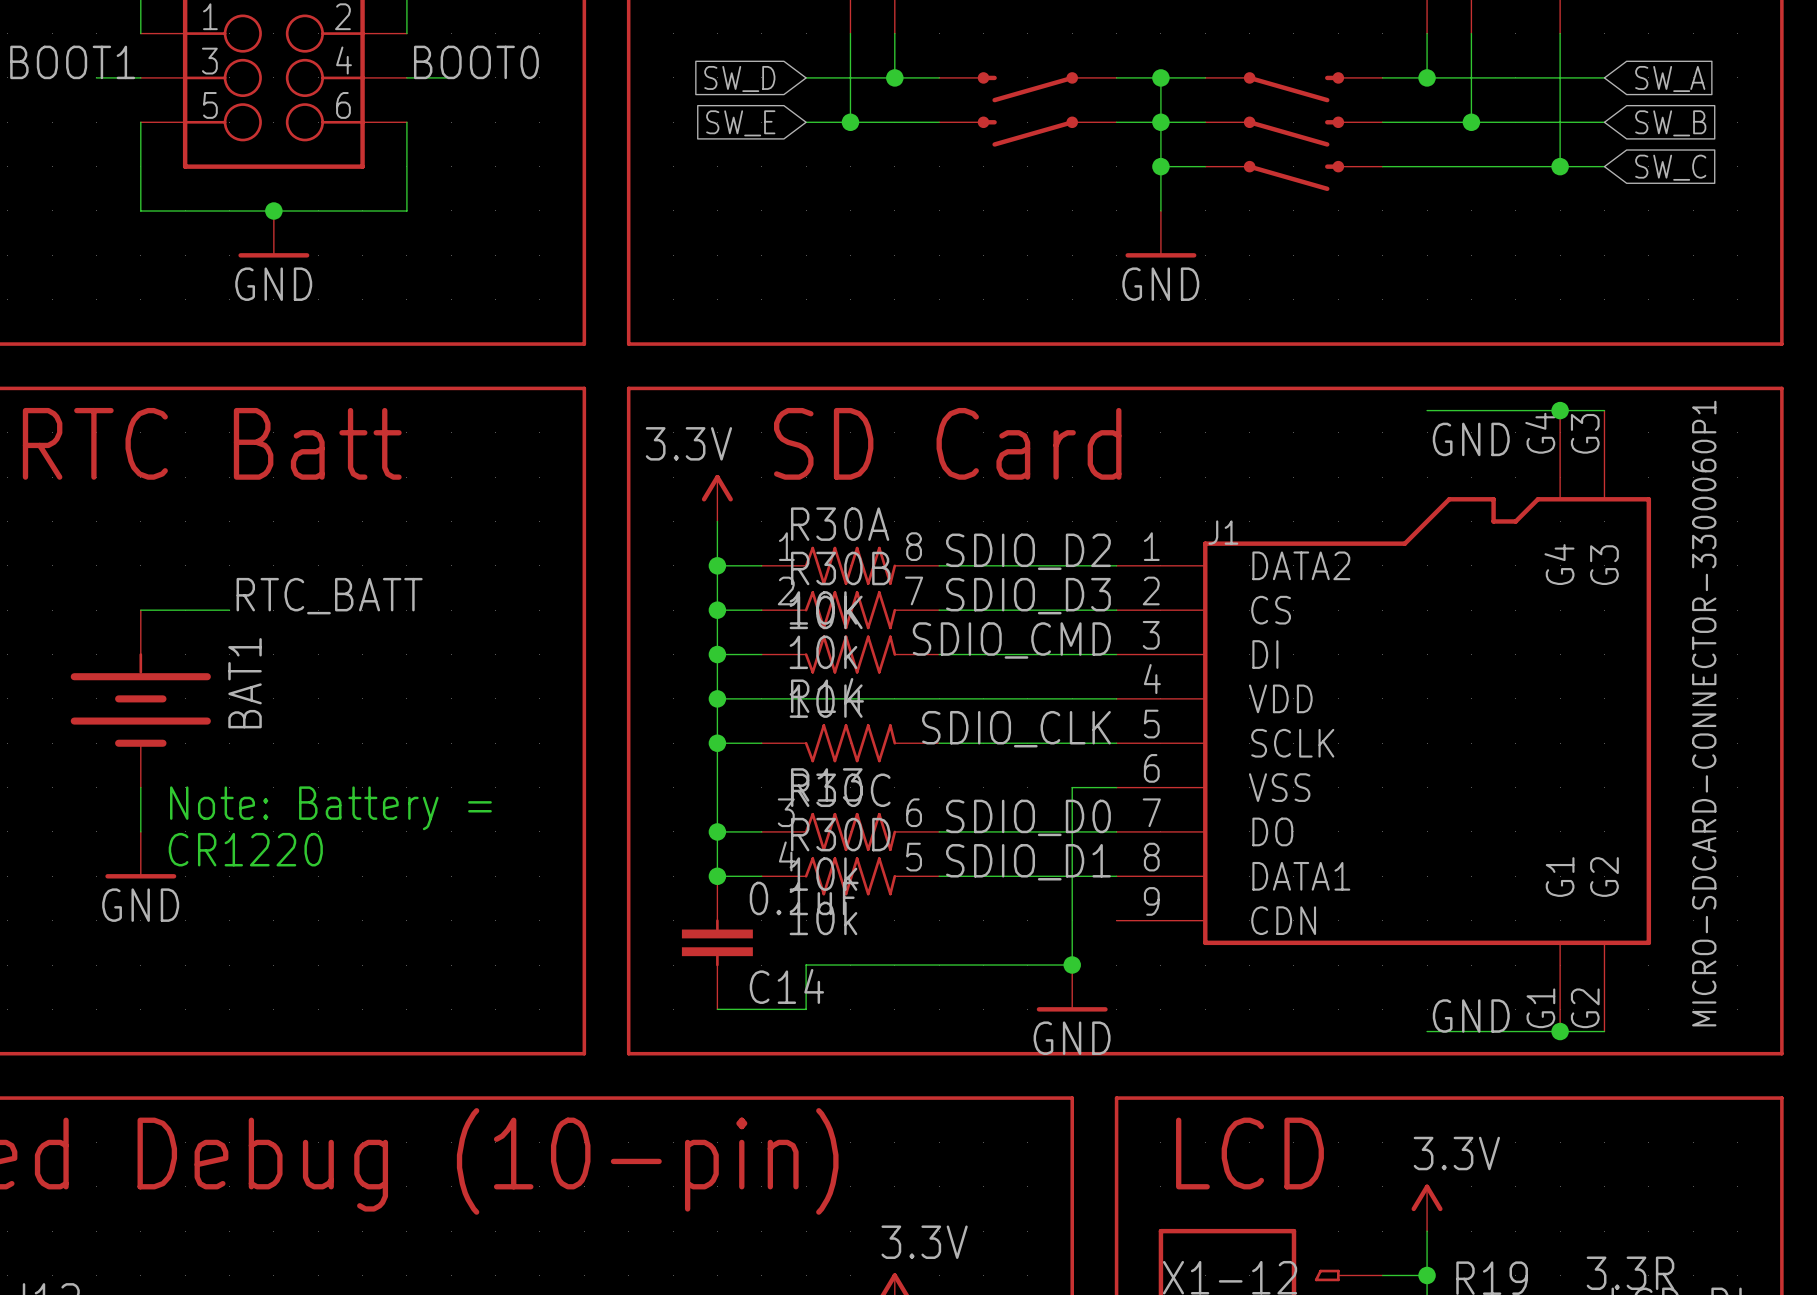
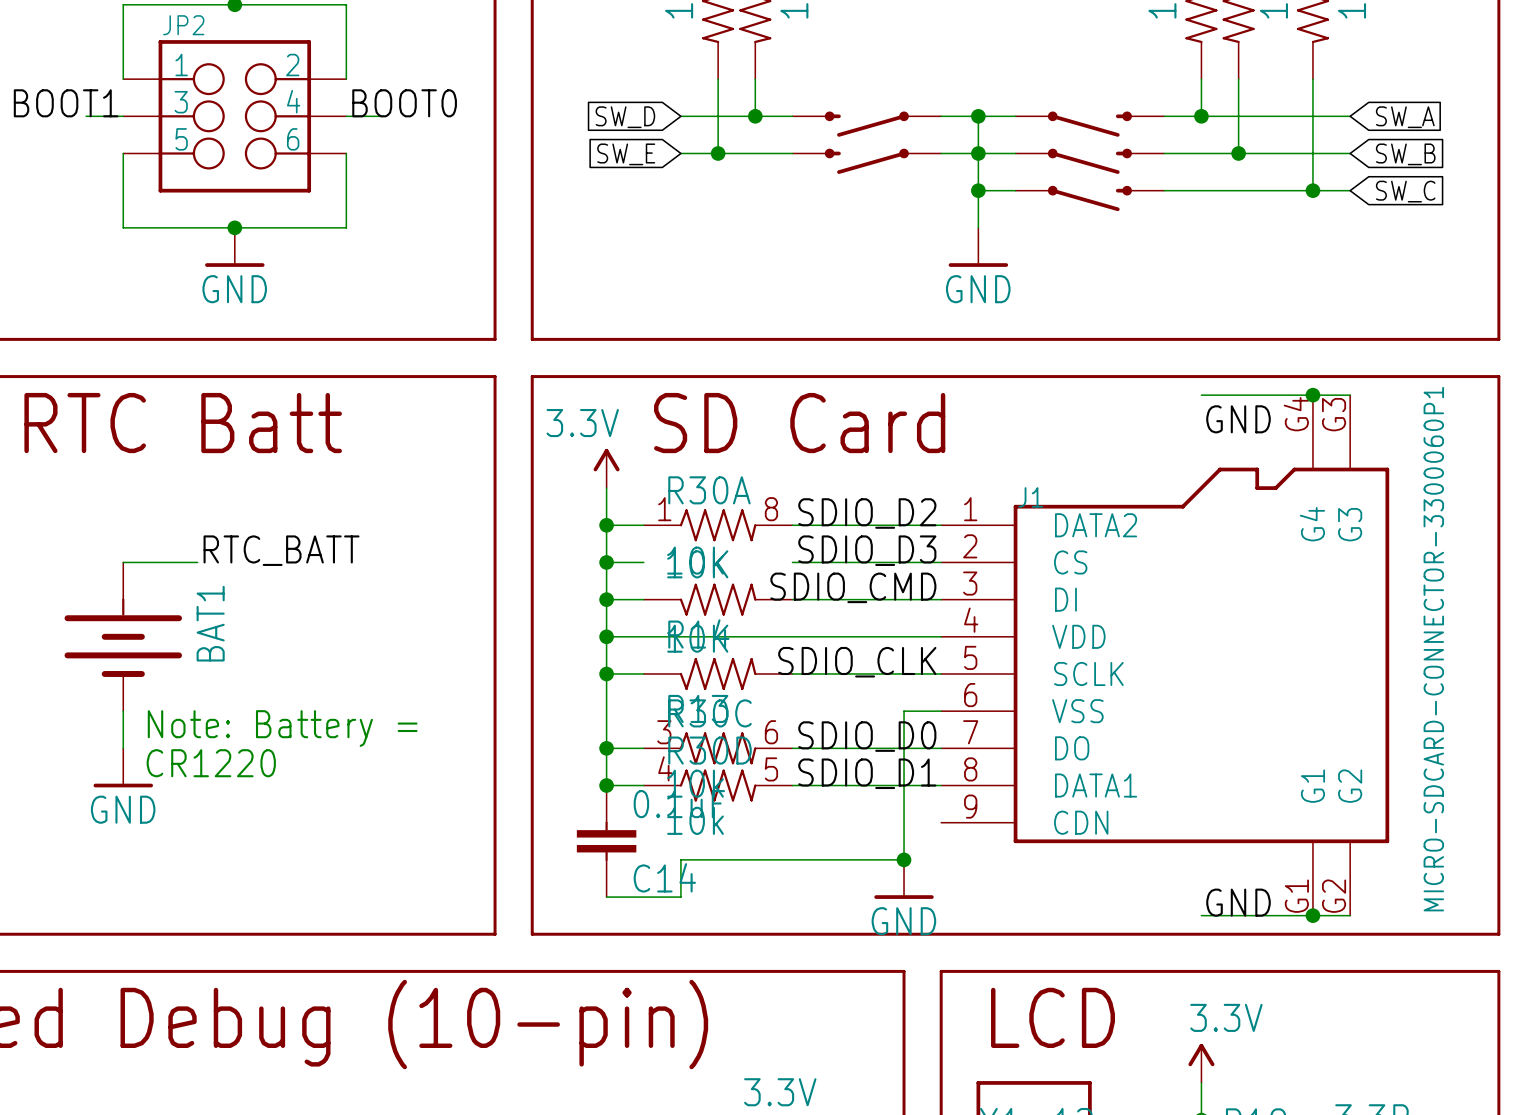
R30B: 10k (850, 610) -> none

